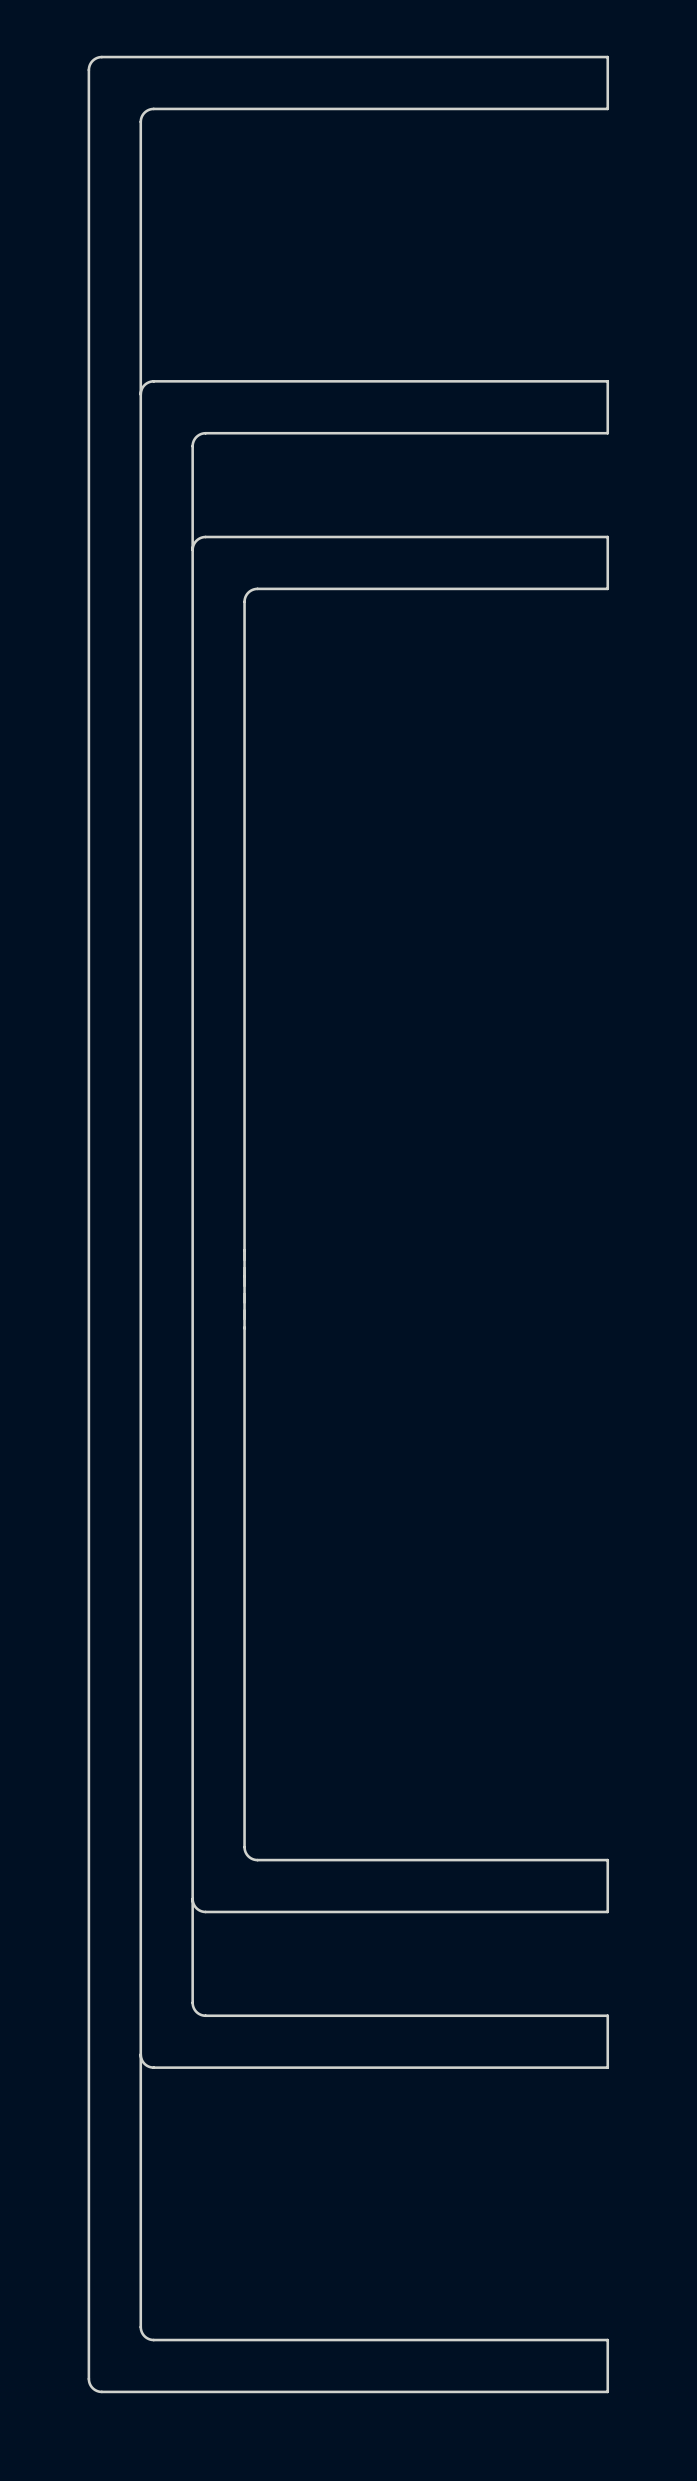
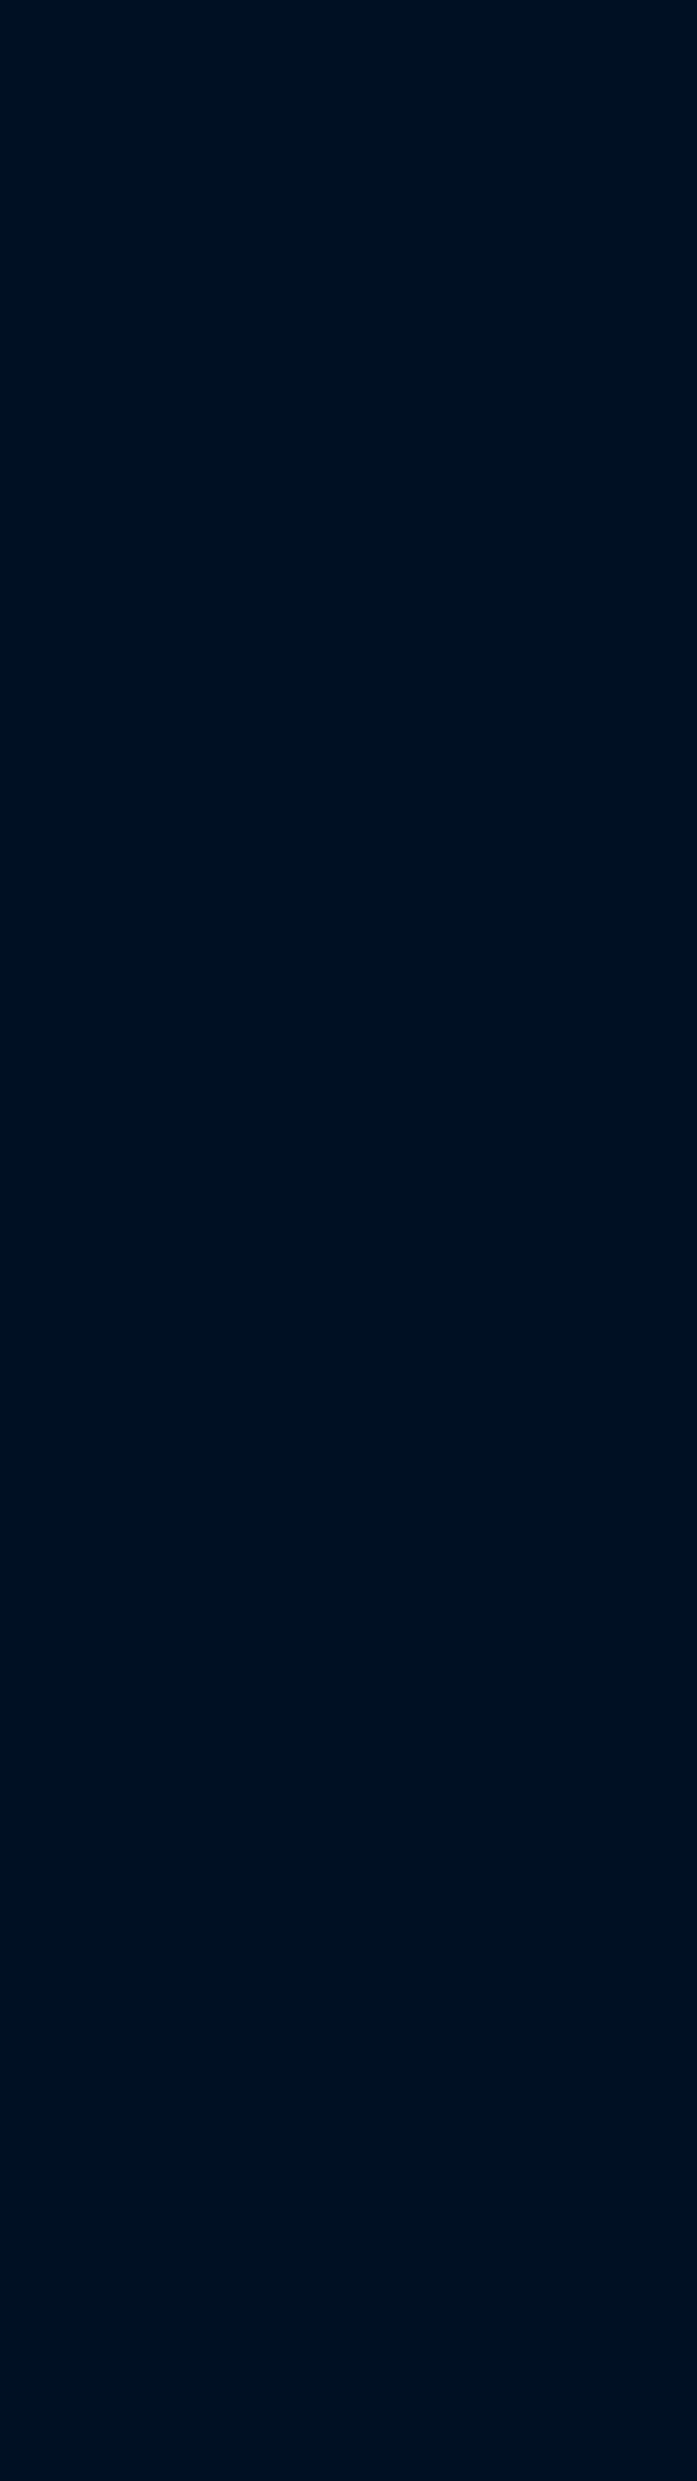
board edge: (101, 57) (607, 57) (607, 108) (153, 108) (144, 112) (140, 121) (141, 2330) (145, 2337) (153, 2340) (607, 2340) (607, 2391) (101, 2391) (93, 2389) (89, 2382) (88, 70) (92, 60) (101, 57) -> none
board edge: (140, 394) (144, 385) (153, 381) (607, 381) (607, 433) (205, 433) (196, 437) (192, 446) (193, 2006) (197, 2013) (205, 2015) (607, 2015) (607, 2067) (153, 2067) (144, 2063) (140, 2054) -> none
board edge: (192, 549) (196, 540) (205, 536) (607, 536) (607, 588) (257, 588) (248, 592) (244, 601) (244, 1850) (249, 1857) (257, 1860) (607, 1860) (607, 1911) (205, 1911) (196, 1908) (192, 1899) -> none

